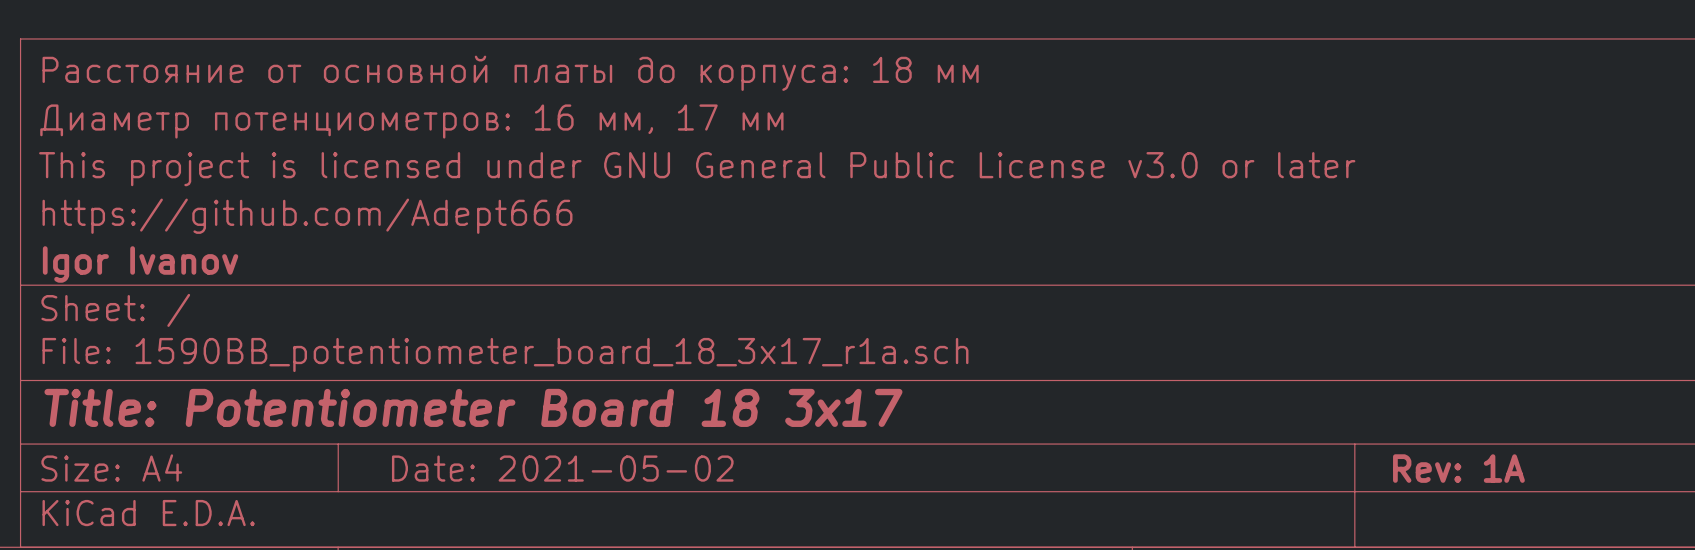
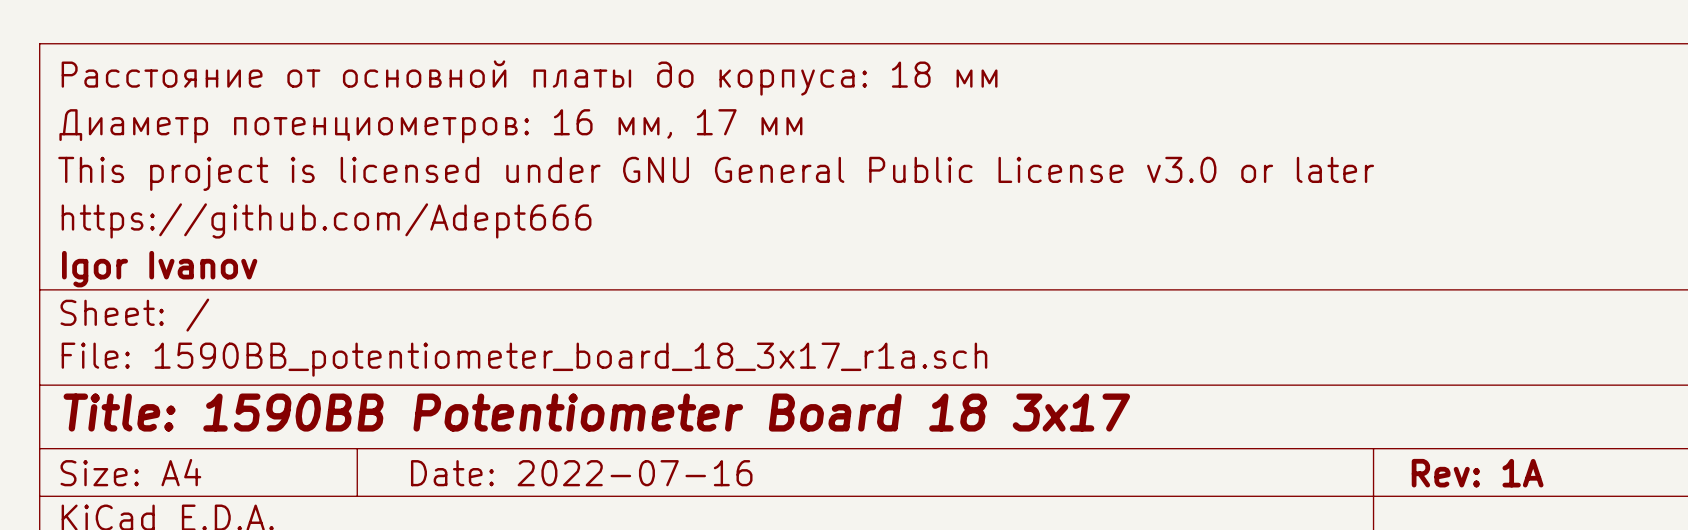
title block: Title: Potentiometer Board 18 3x17 (473, 407) -> Title: 1590BB Potentiometer Board 18 3x17 (596, 412)
title block: Date: 2021-05-02 (562, 468) -> Date: 2022-07-16 (581, 473)

